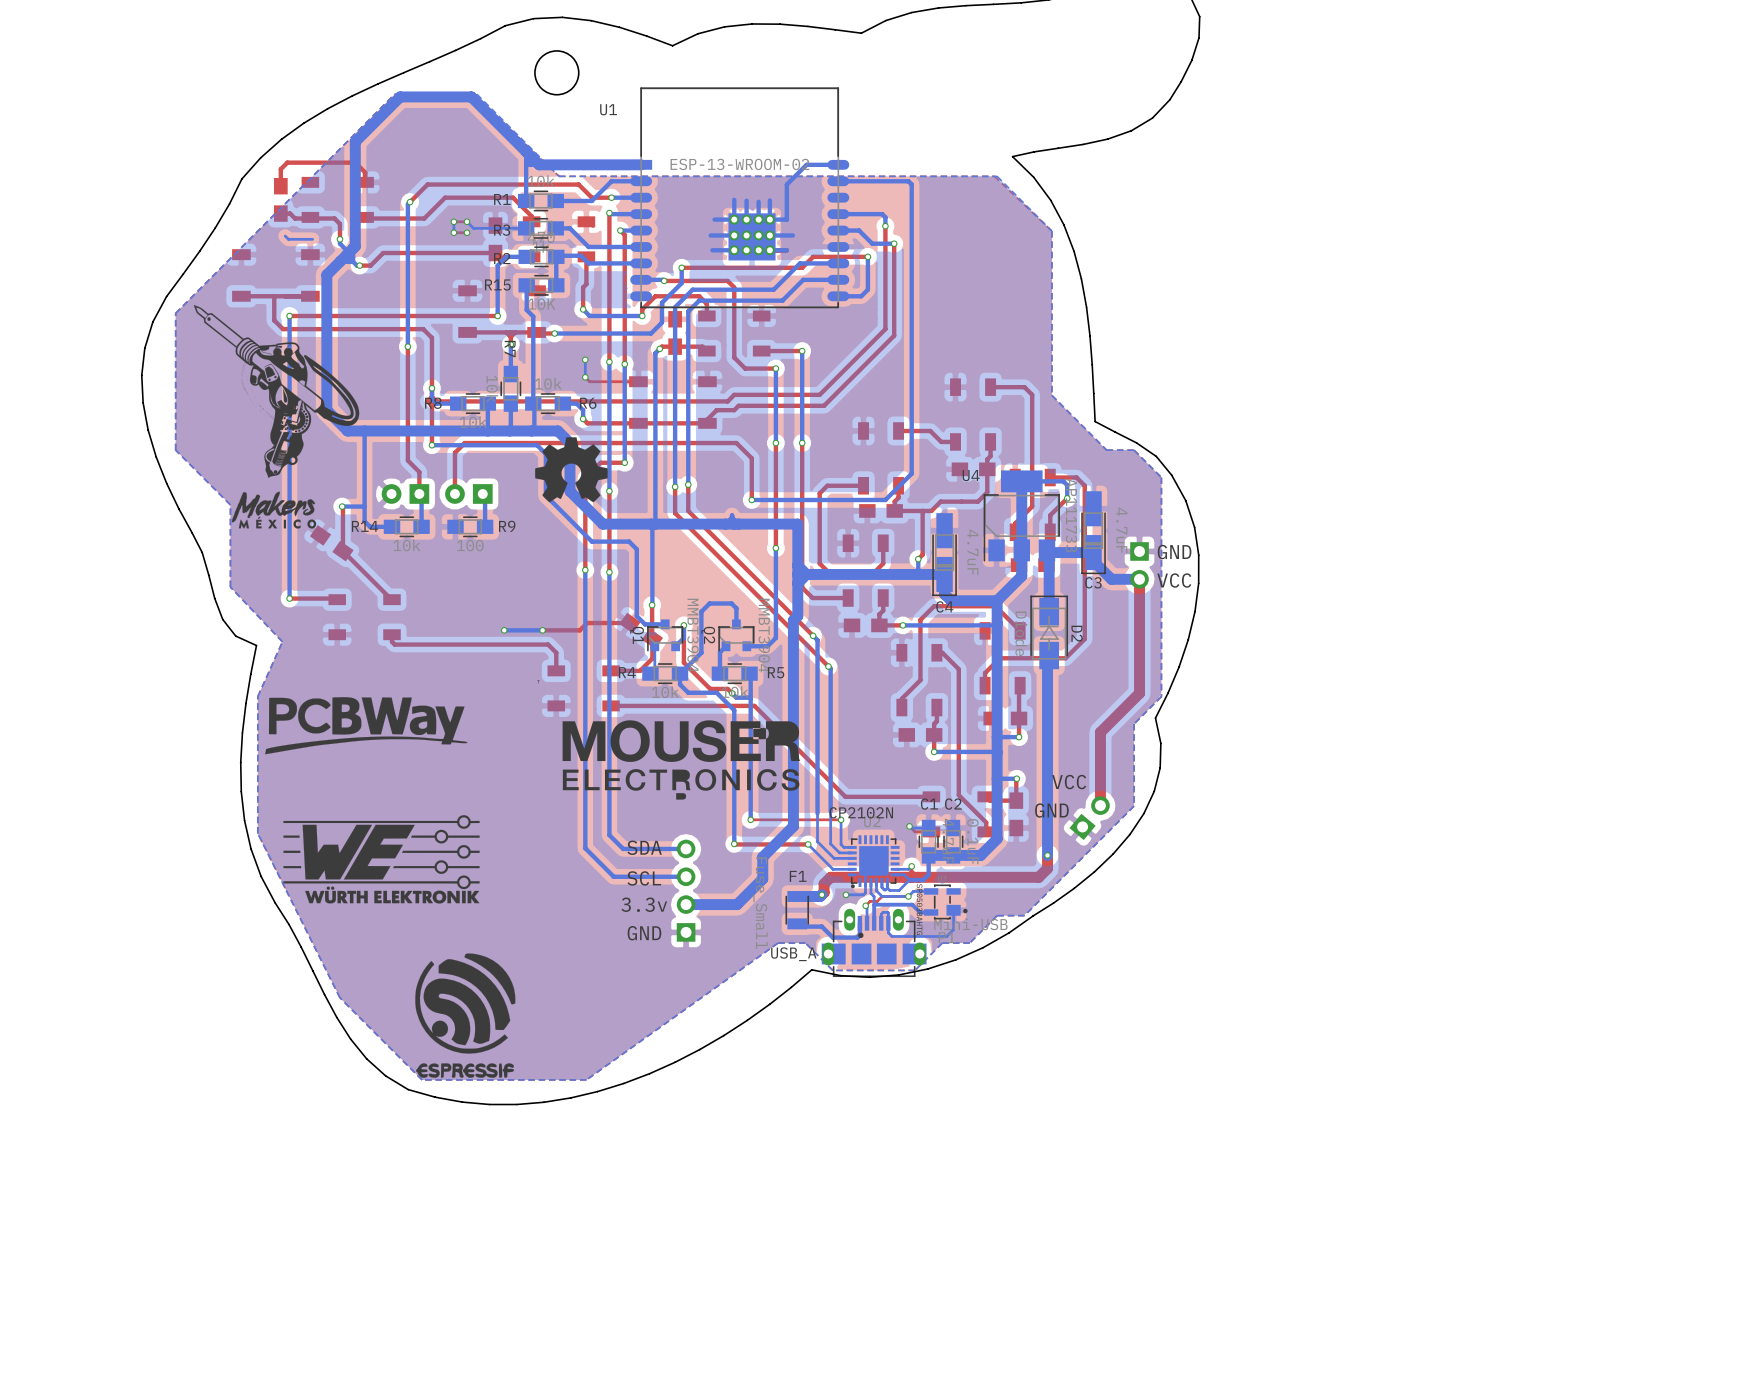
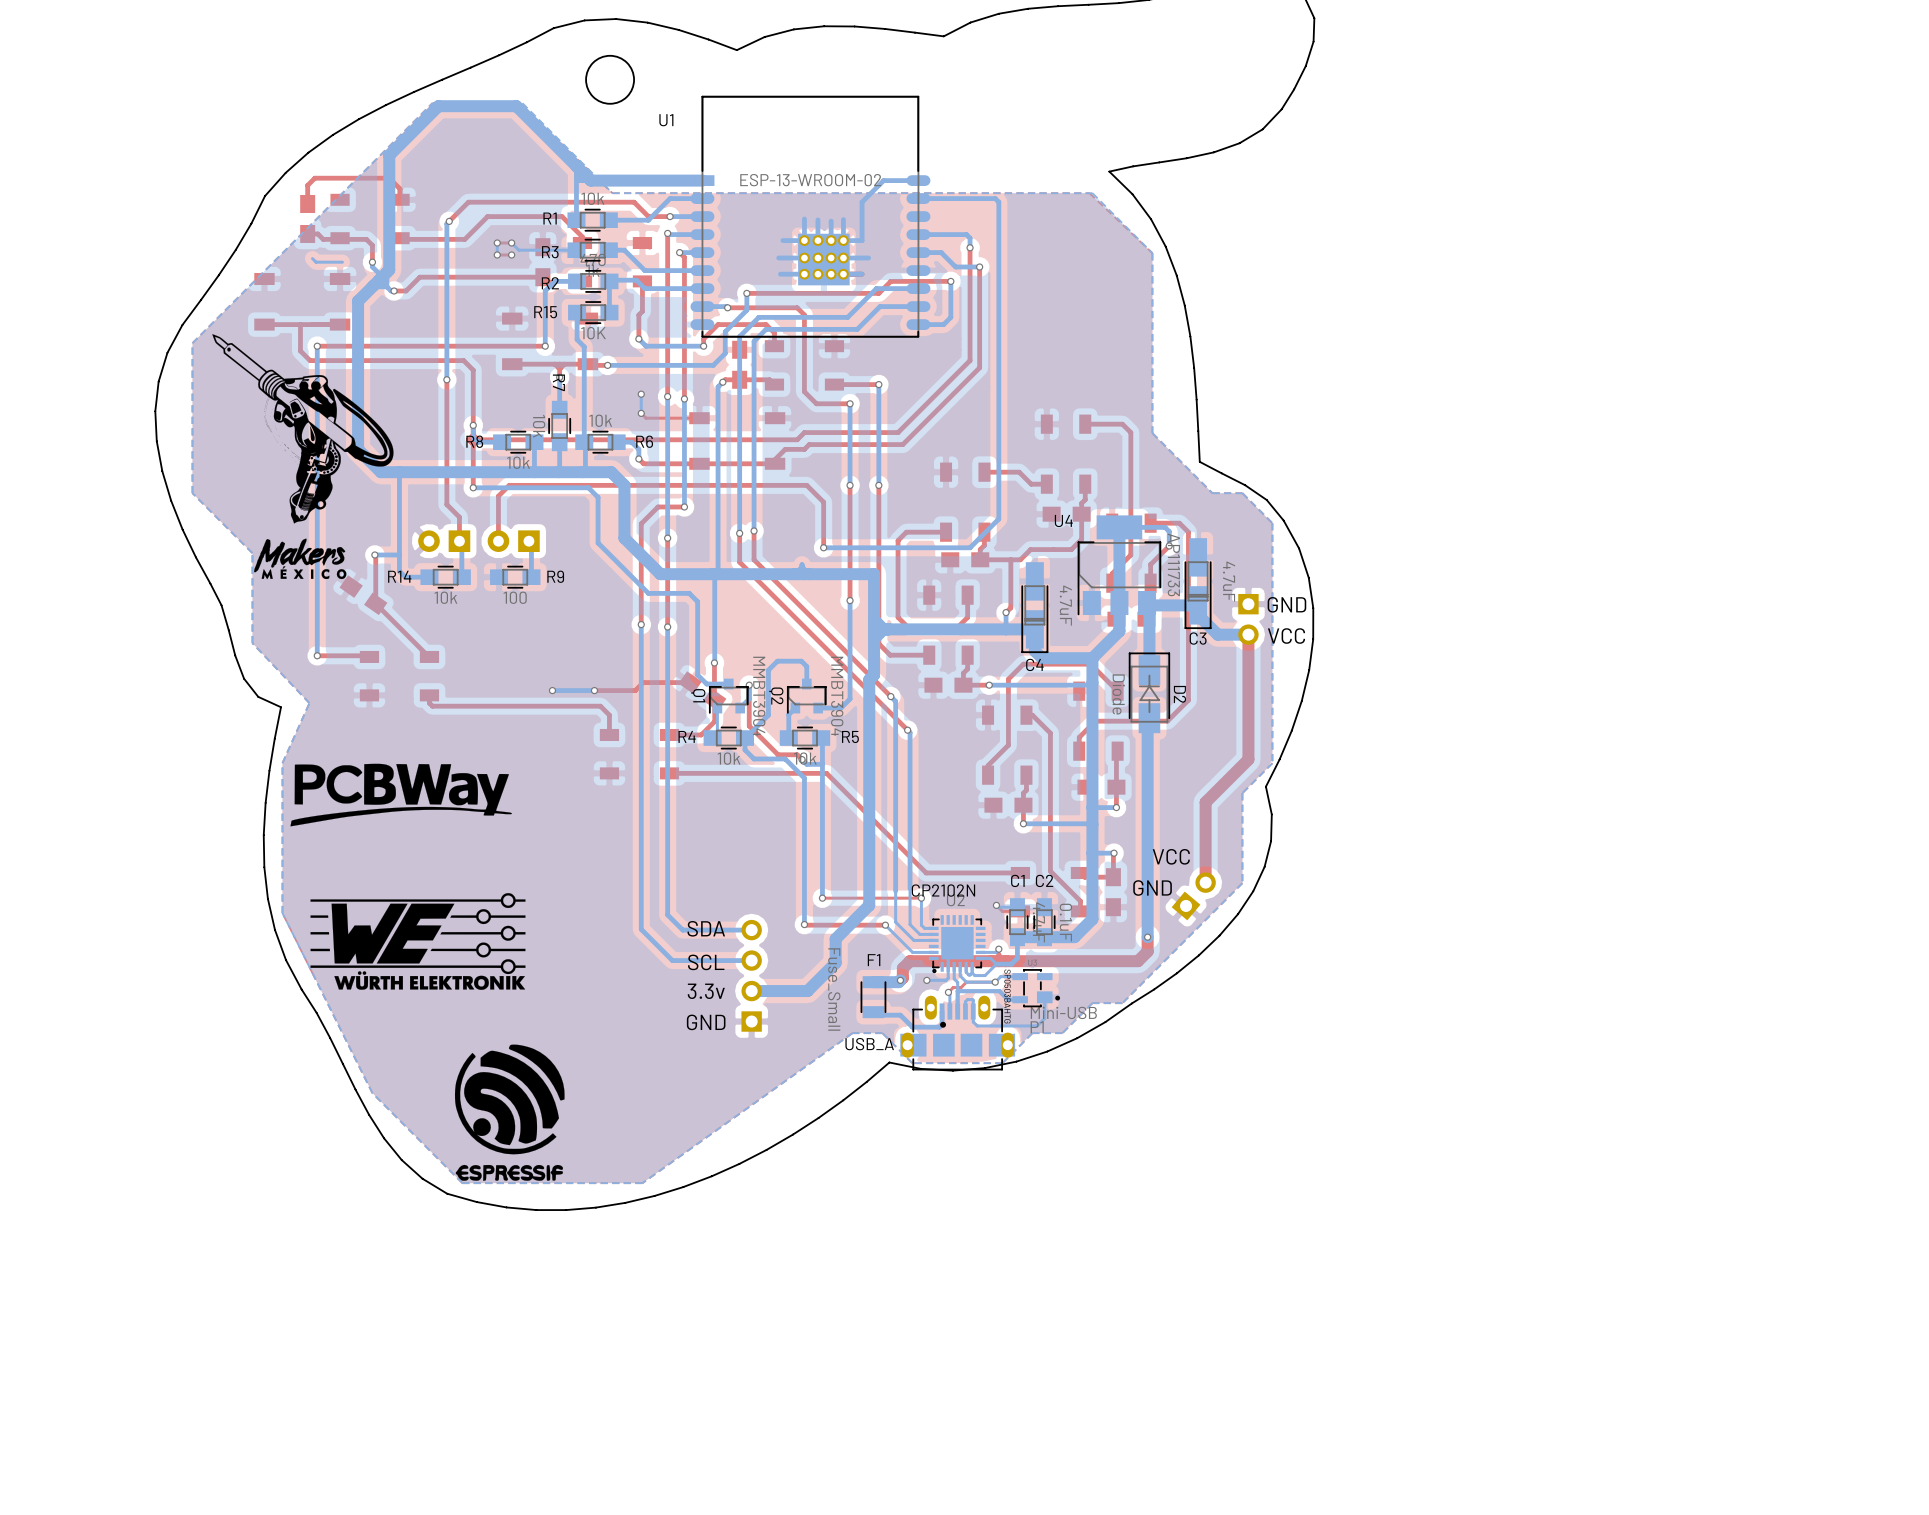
drawing: [535, 437, 608, 503] -> none
drawing: [537, 680, 801, 800] -> none

